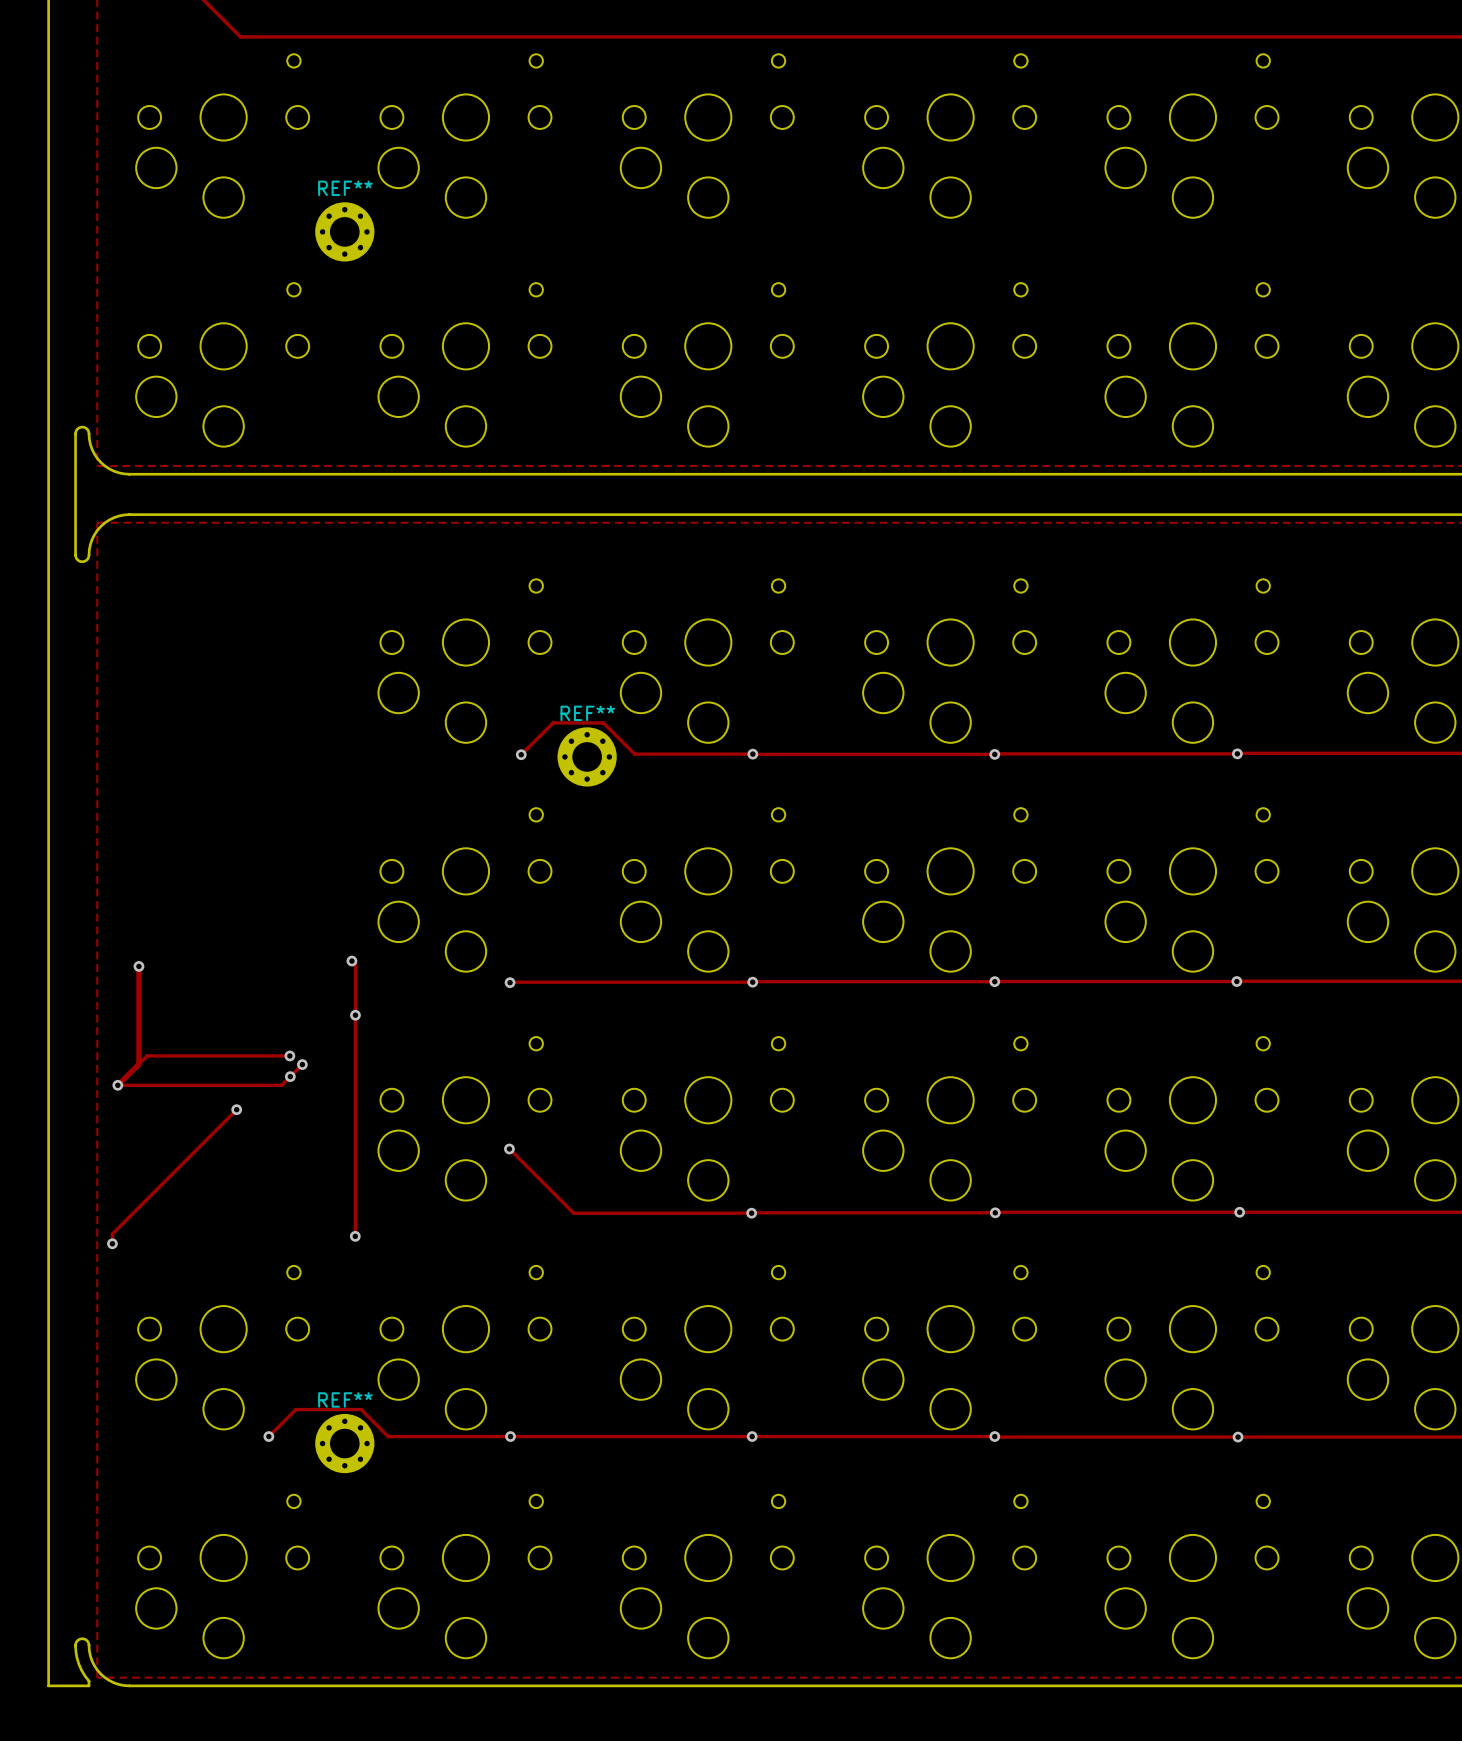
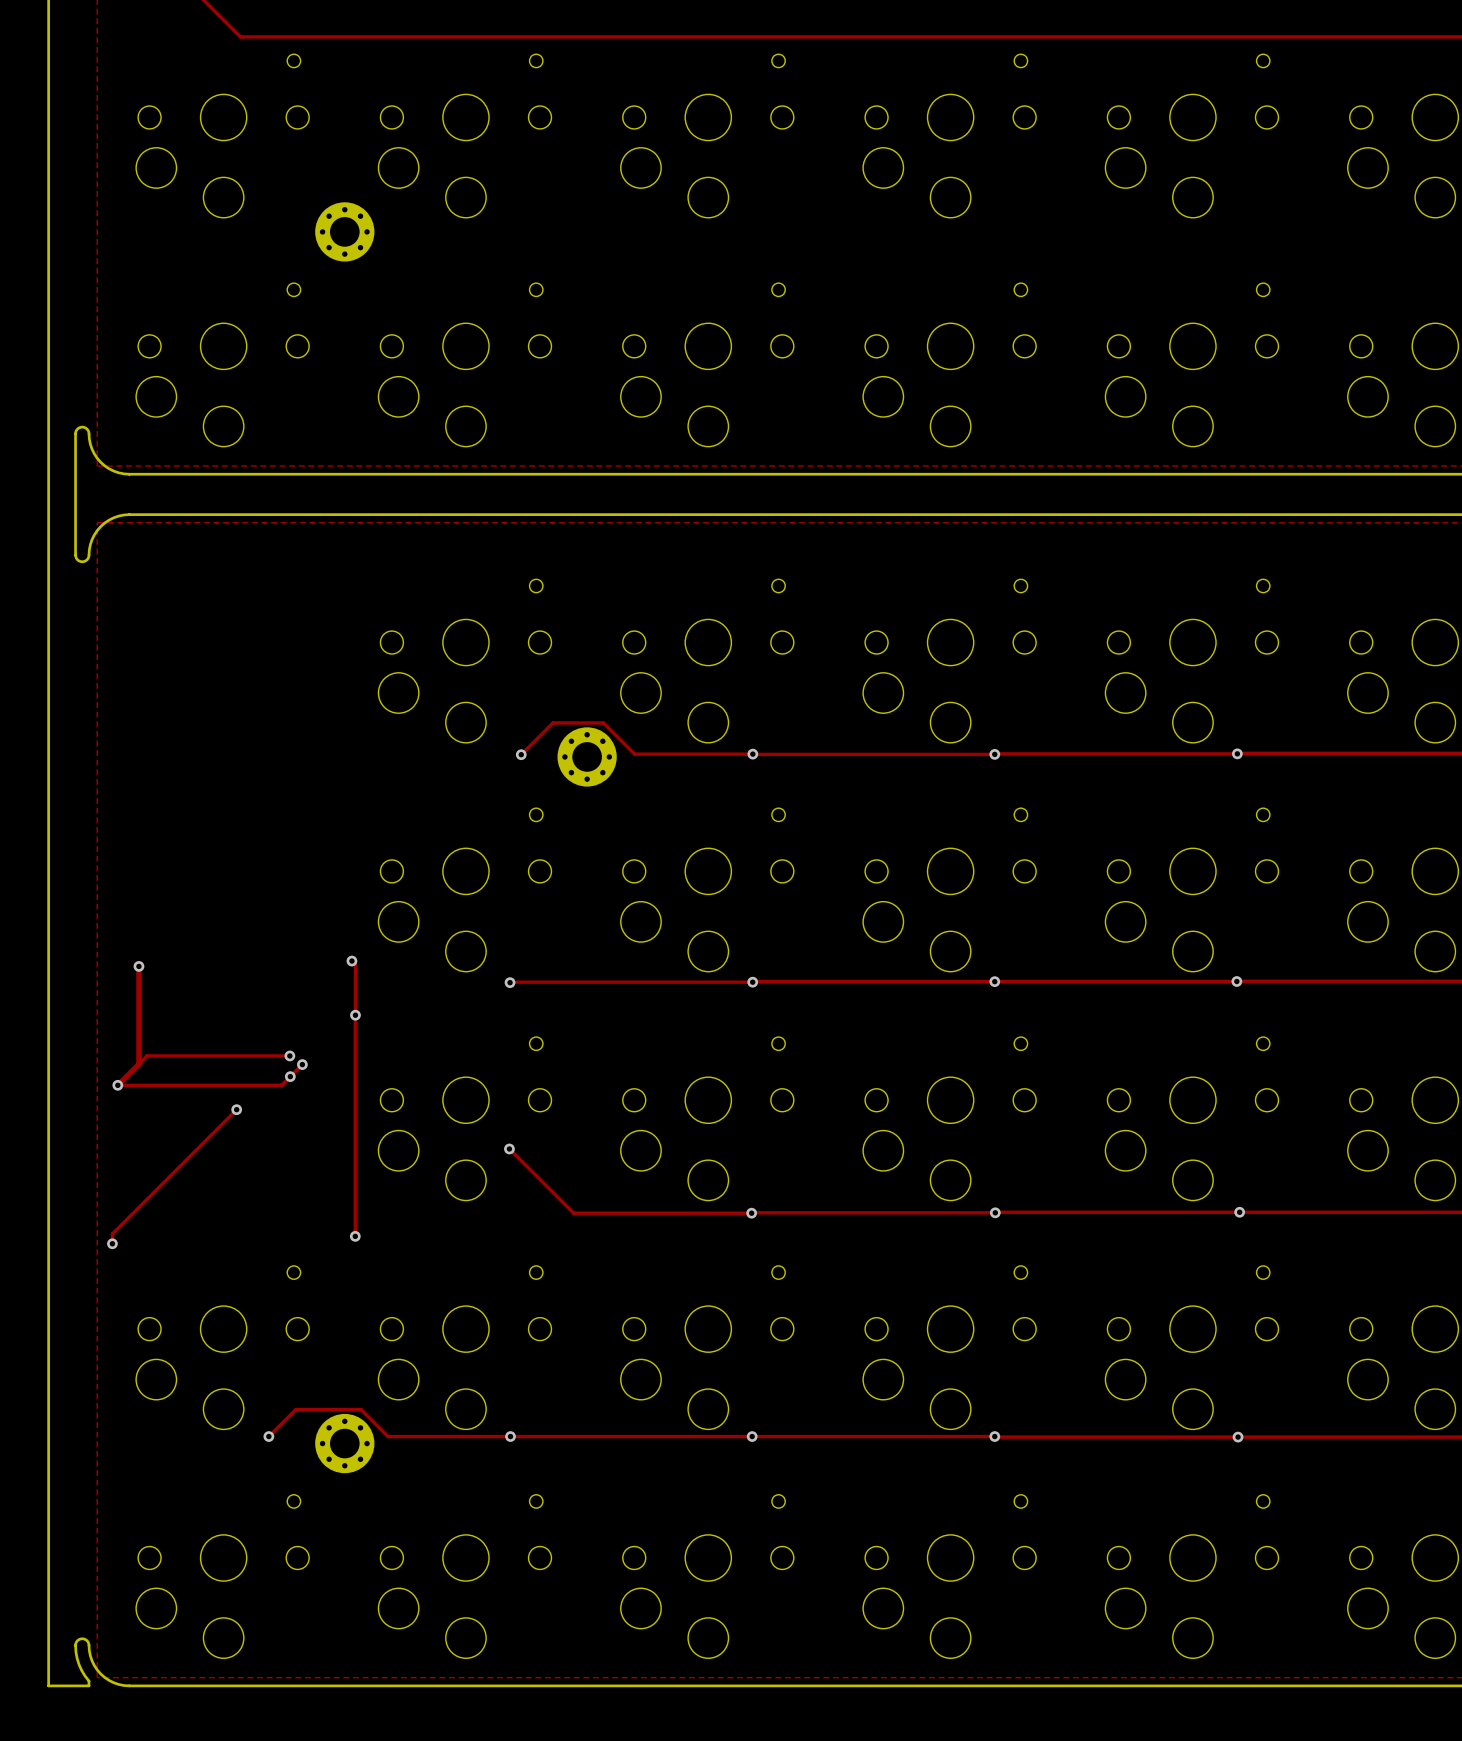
REF** name: REF** (345, 188) -> none
REF** name: REF** (587, 713) -> none
REF** name: REF** (345, 1399) -> none

